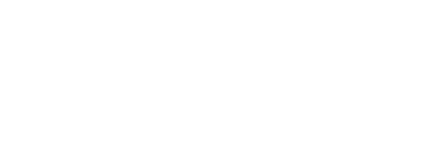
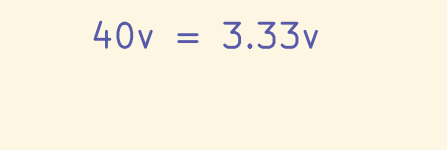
text: none -> 40v = 3.33v (205, 34)

